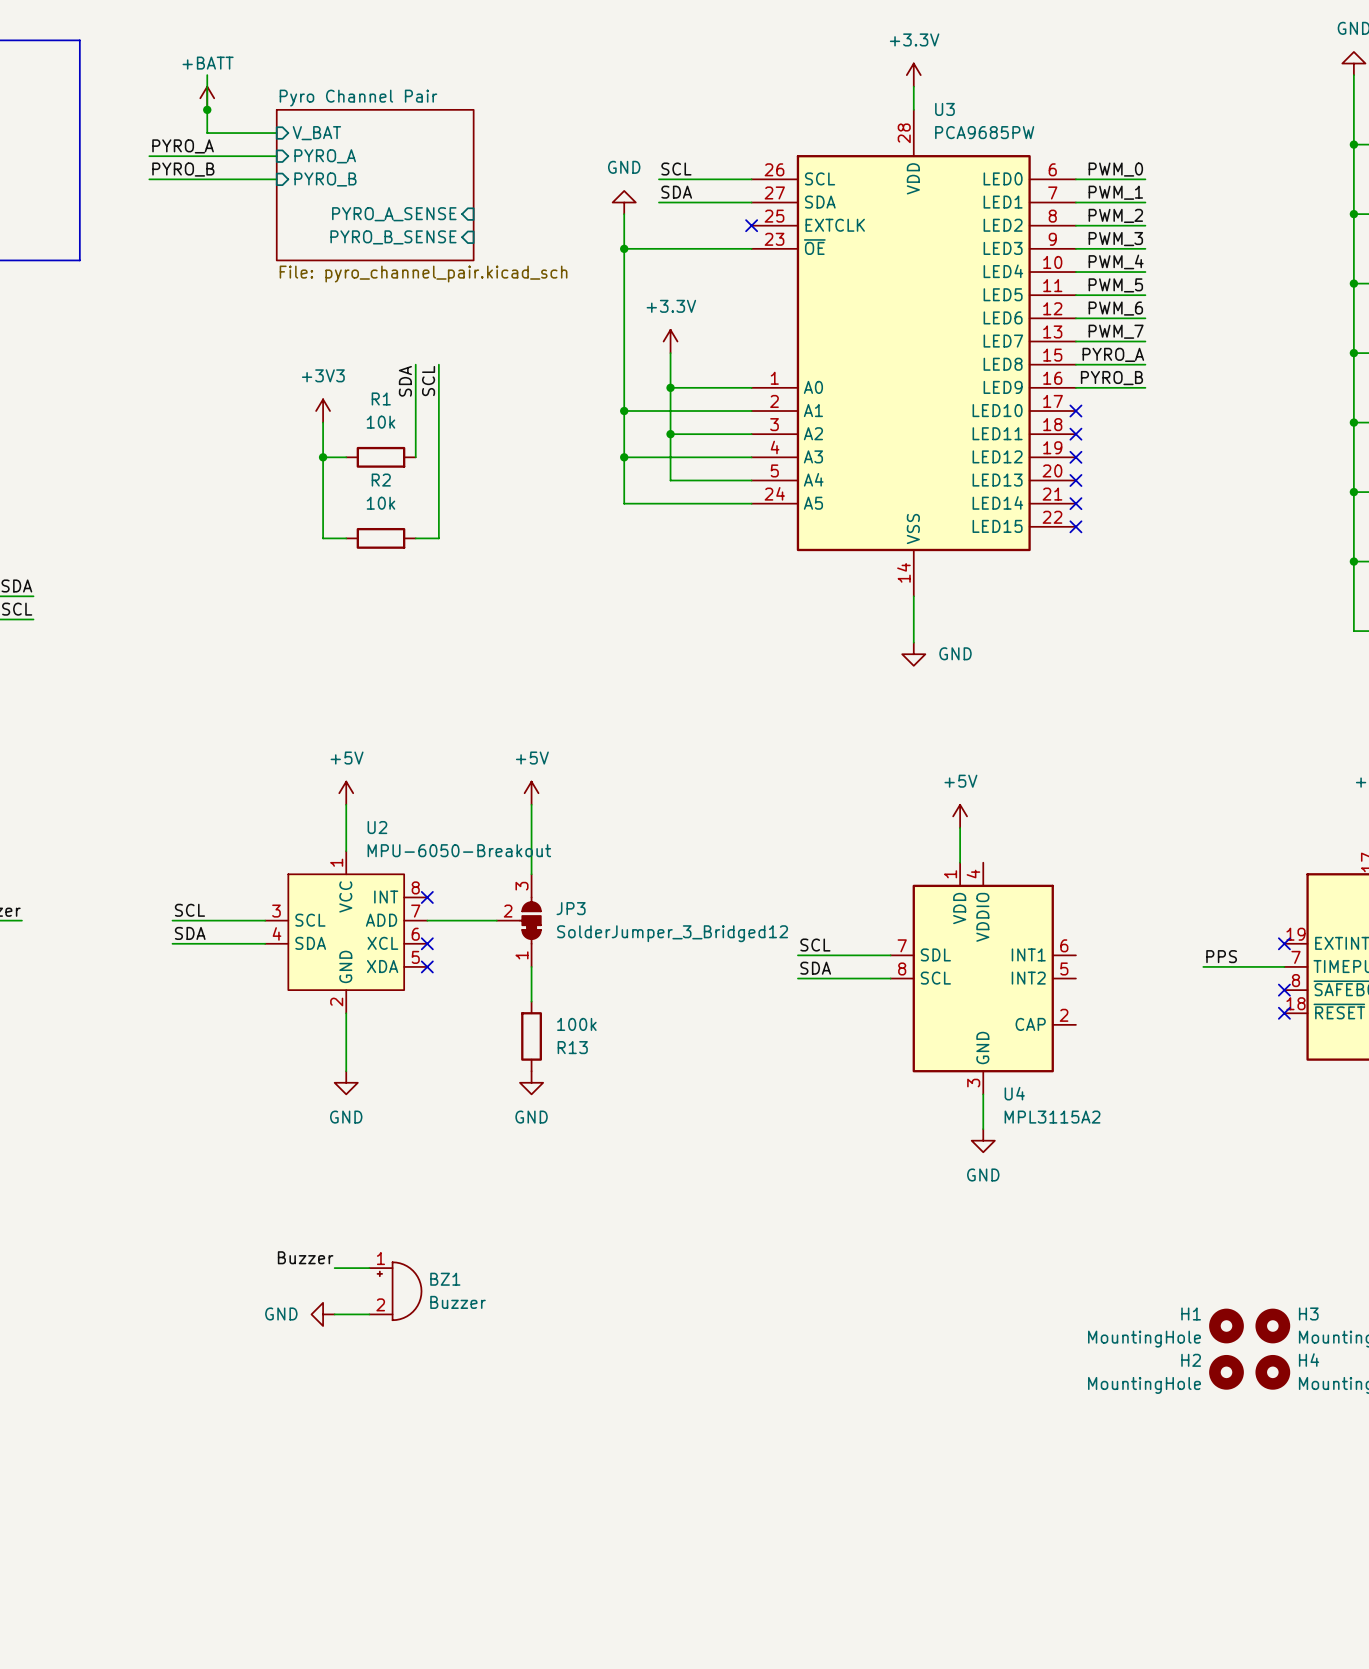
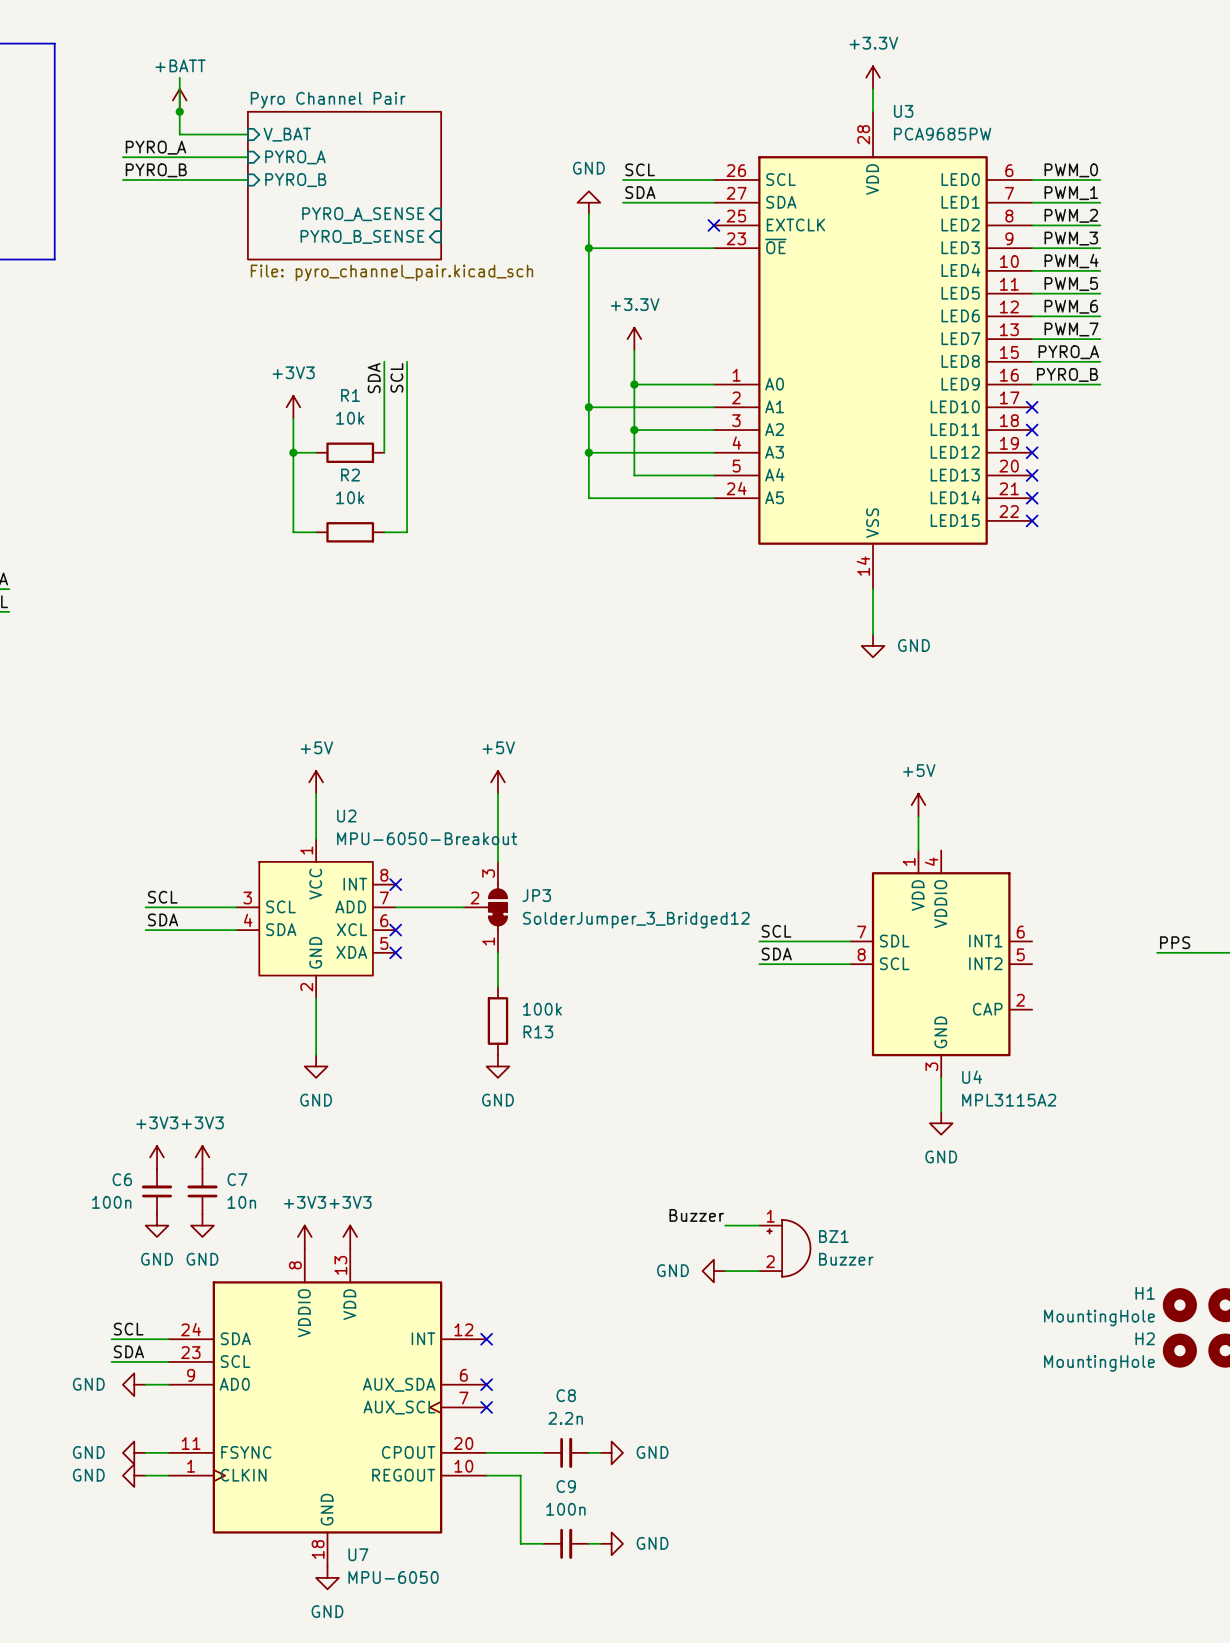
power symbol: none -> +3V3 (157, 1157)
power symbol: none -> +3V3 (202, 1157)
C6: none -> 100n (157, 1191)
C7: none -> 10n (202, 1191)
label: none -> Buzzer (696, 1215)
power symbol: none -> GND (157, 1225)
power symbol: none -> GND (202, 1225)
wire: none -> (725, 1225) (759, 1225)
power symbol: none -> +3V3 (304, 1236)
power symbol: none -> +3V3 (350, 1236)
label: Buzzer (305, 1257) -> none
wire: (334, 1268) (369, 1268) -> none
BZ1 position: (395, 1291) -> (784, 1248)
power symbol: none -> GND (713, 1271)
wire: none -> (725, 1271) (759, 1271)
power symbol: GND (323, 1314) -> none
label: none -> SCL (128, 1329)
wire: none -> (111, 1339) (168, 1339)
no-connect mark: none -> (486, 1339)
label: none -> SDA (128, 1351)
wire: none -> (111, 1361) (168, 1361)
power symbol: none -> GND (134, 1384)
wire: none -> (145, 1384) (168, 1384)
no-connect mark: none -> (486, 1384)
U7: none -> MPU-6050 (327, 1407)
no-connect mark: none -> (486, 1407)
power symbol: none -> GND (134, 1452)
wire: none -> (145, 1452) (168, 1452)
wire: none -> (486, 1452) (543, 1452)
C8: none -> 2.2n (566, 1452)
wire: none -> (588, 1452) (600, 1452)
power symbol: none -> GND (611, 1452)
power symbol: none -> GND (134, 1475)
wire: none -> (145, 1475) (168, 1475)
wire: none -> (486, 1475) (520, 1475) (520, 1543) (543, 1543)
C9: none -> 100n (566, 1543)
wire: none -> (588, 1543) (600, 1543)
power symbol: none -> GND (611, 1543)
power symbol: none -> GND (327, 1577)

